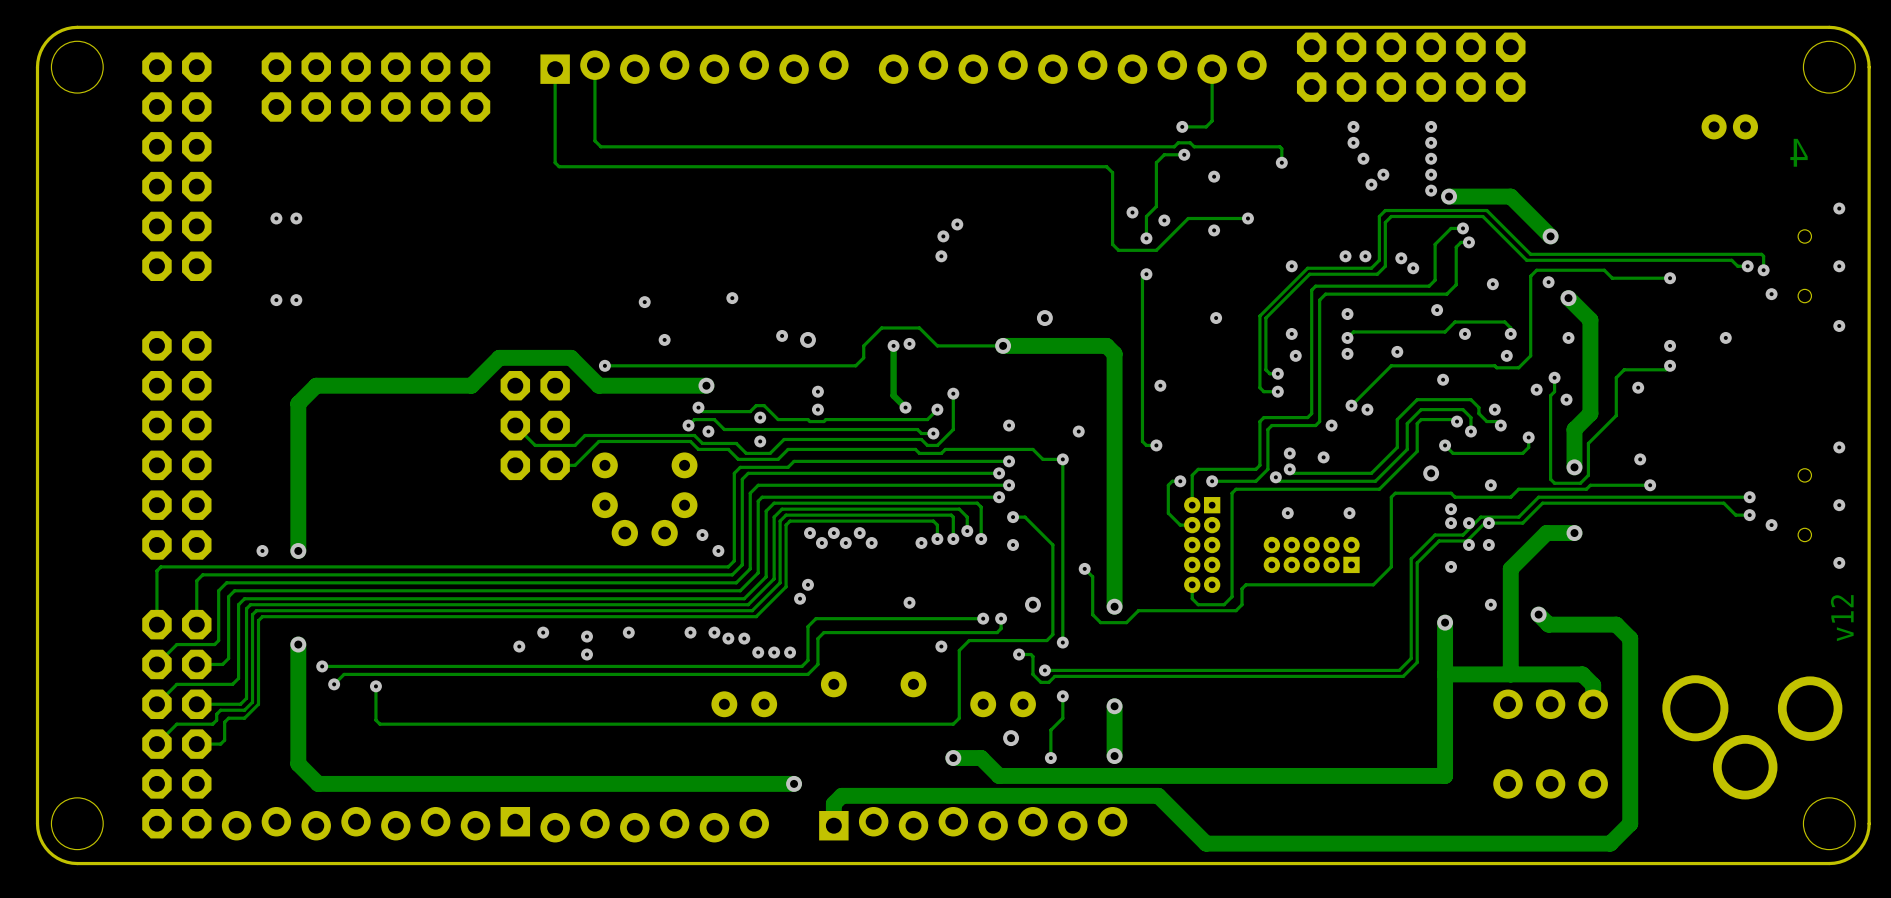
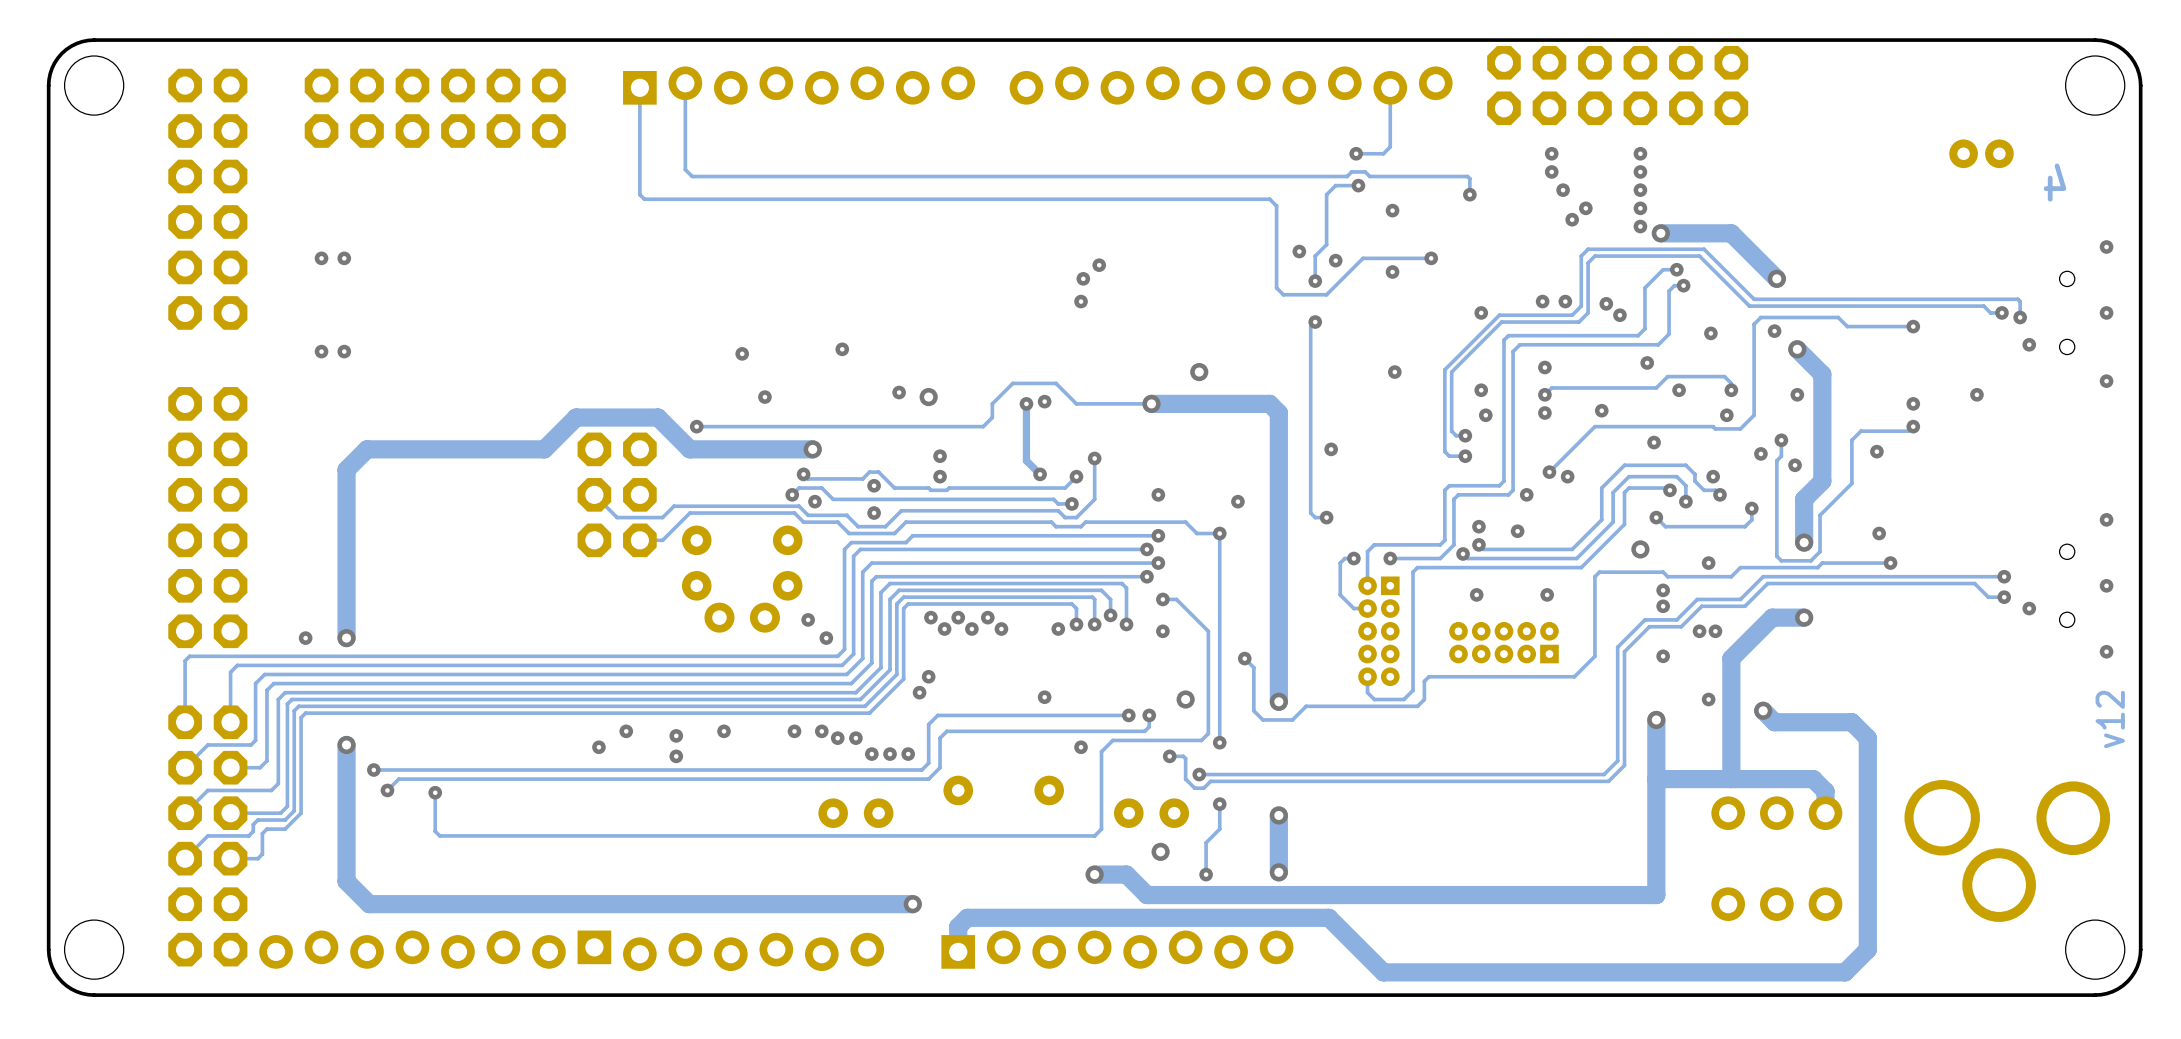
via: (1468, 523) -> none
via: (1488, 523) -> none
via: (1468, 545) -> none
via: none -> (1699, 631)
via: (1488, 545) -> none
via: none -> (1715, 631)

